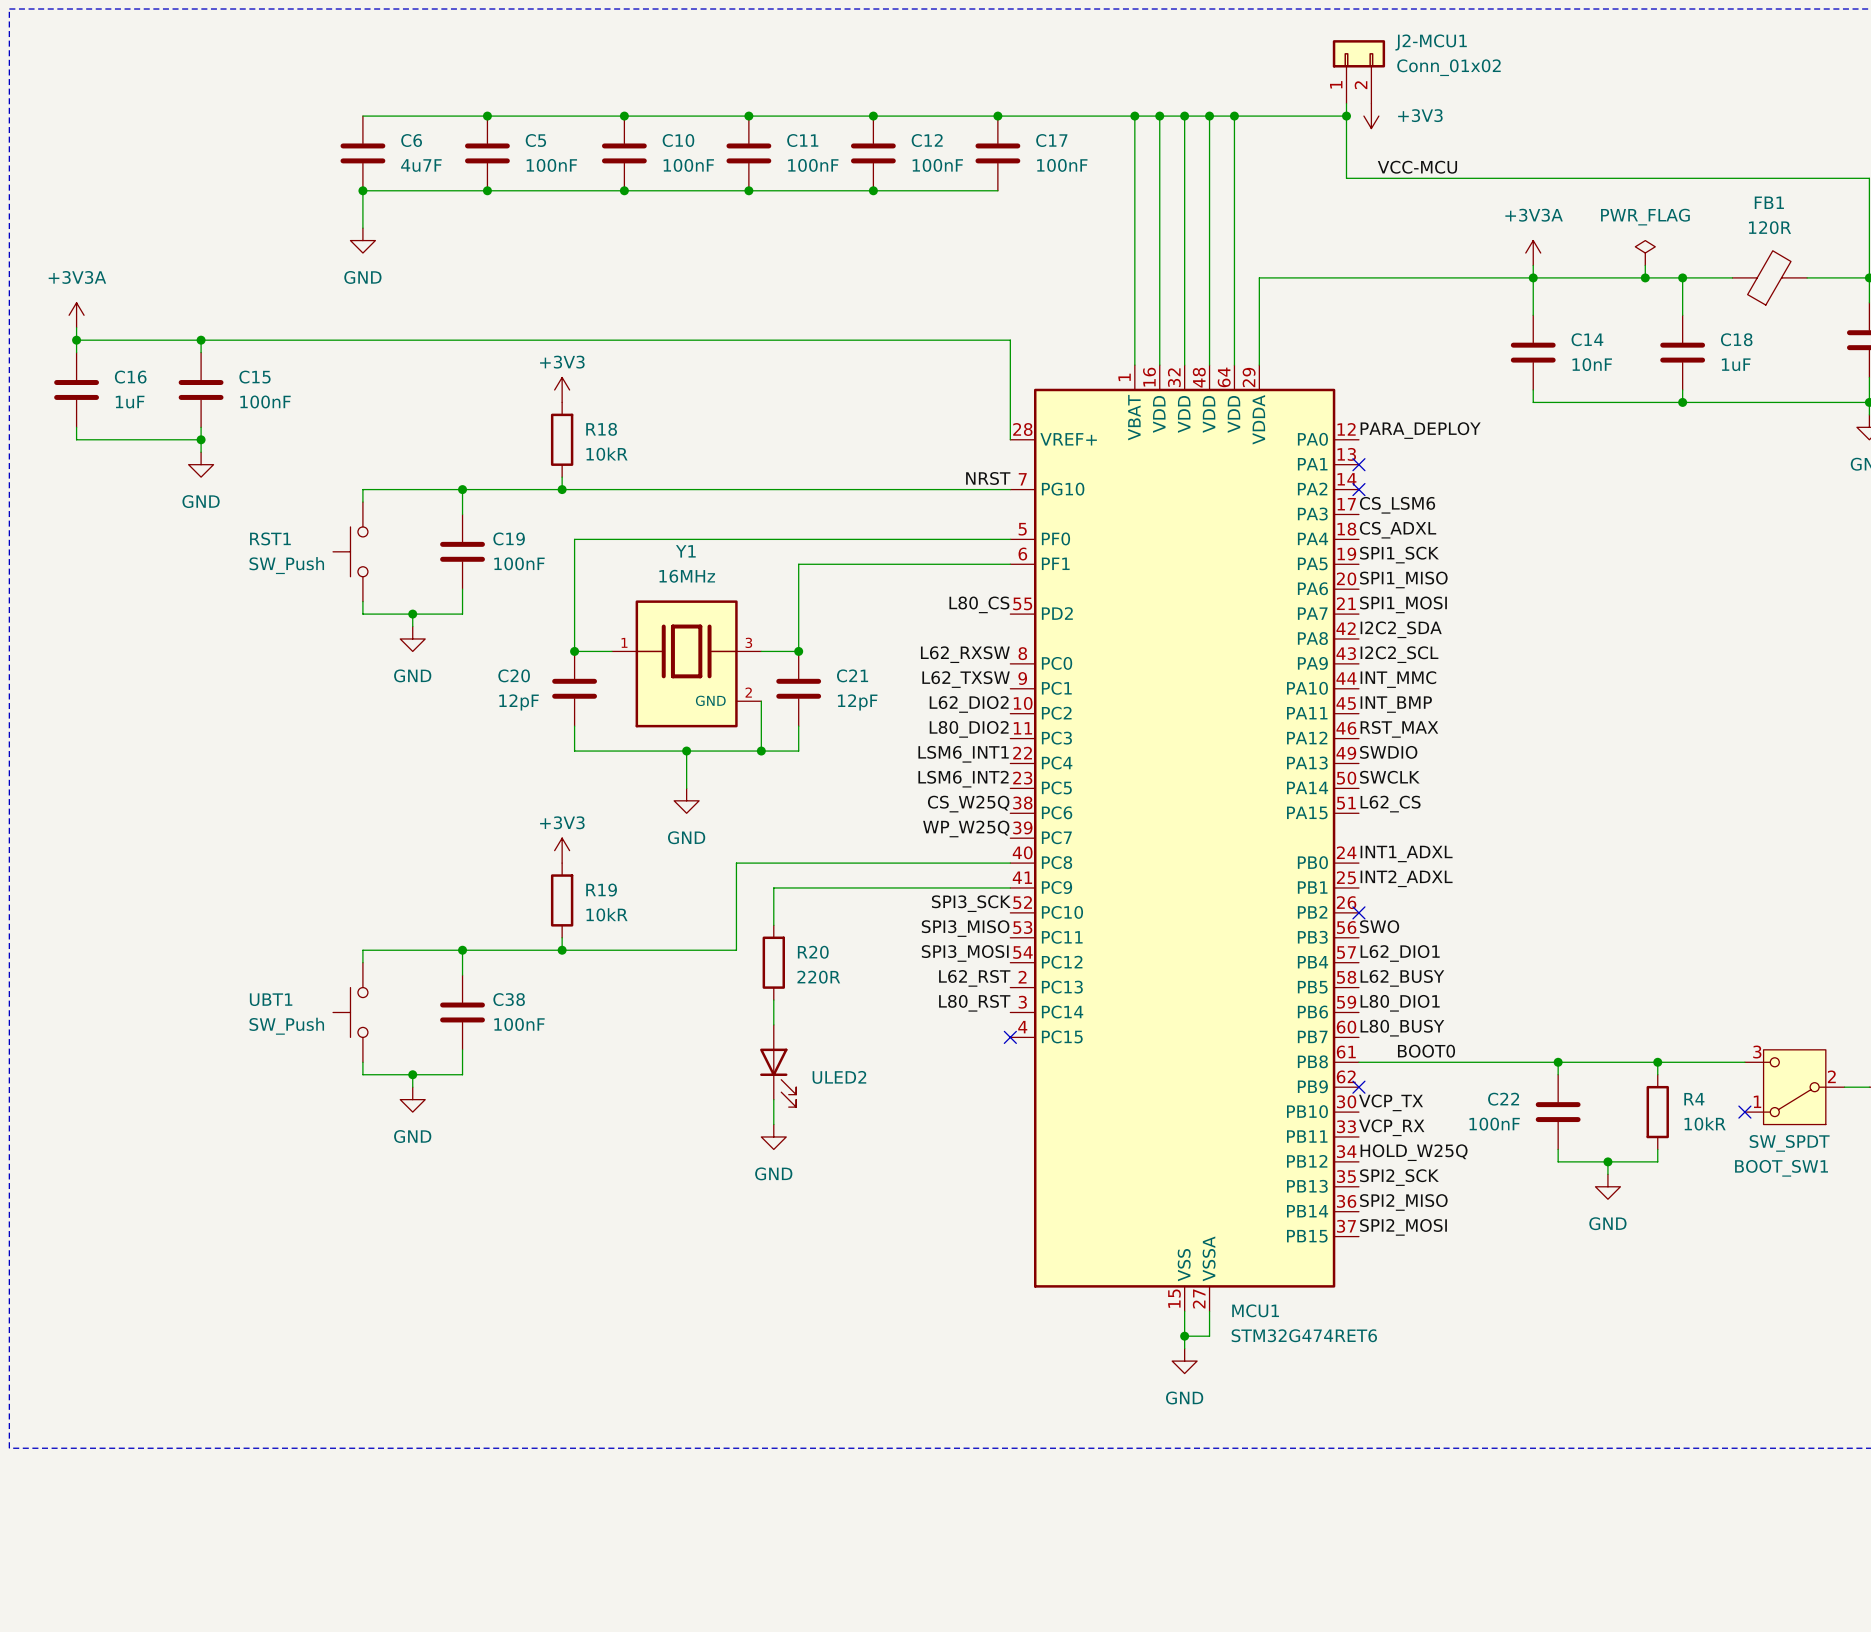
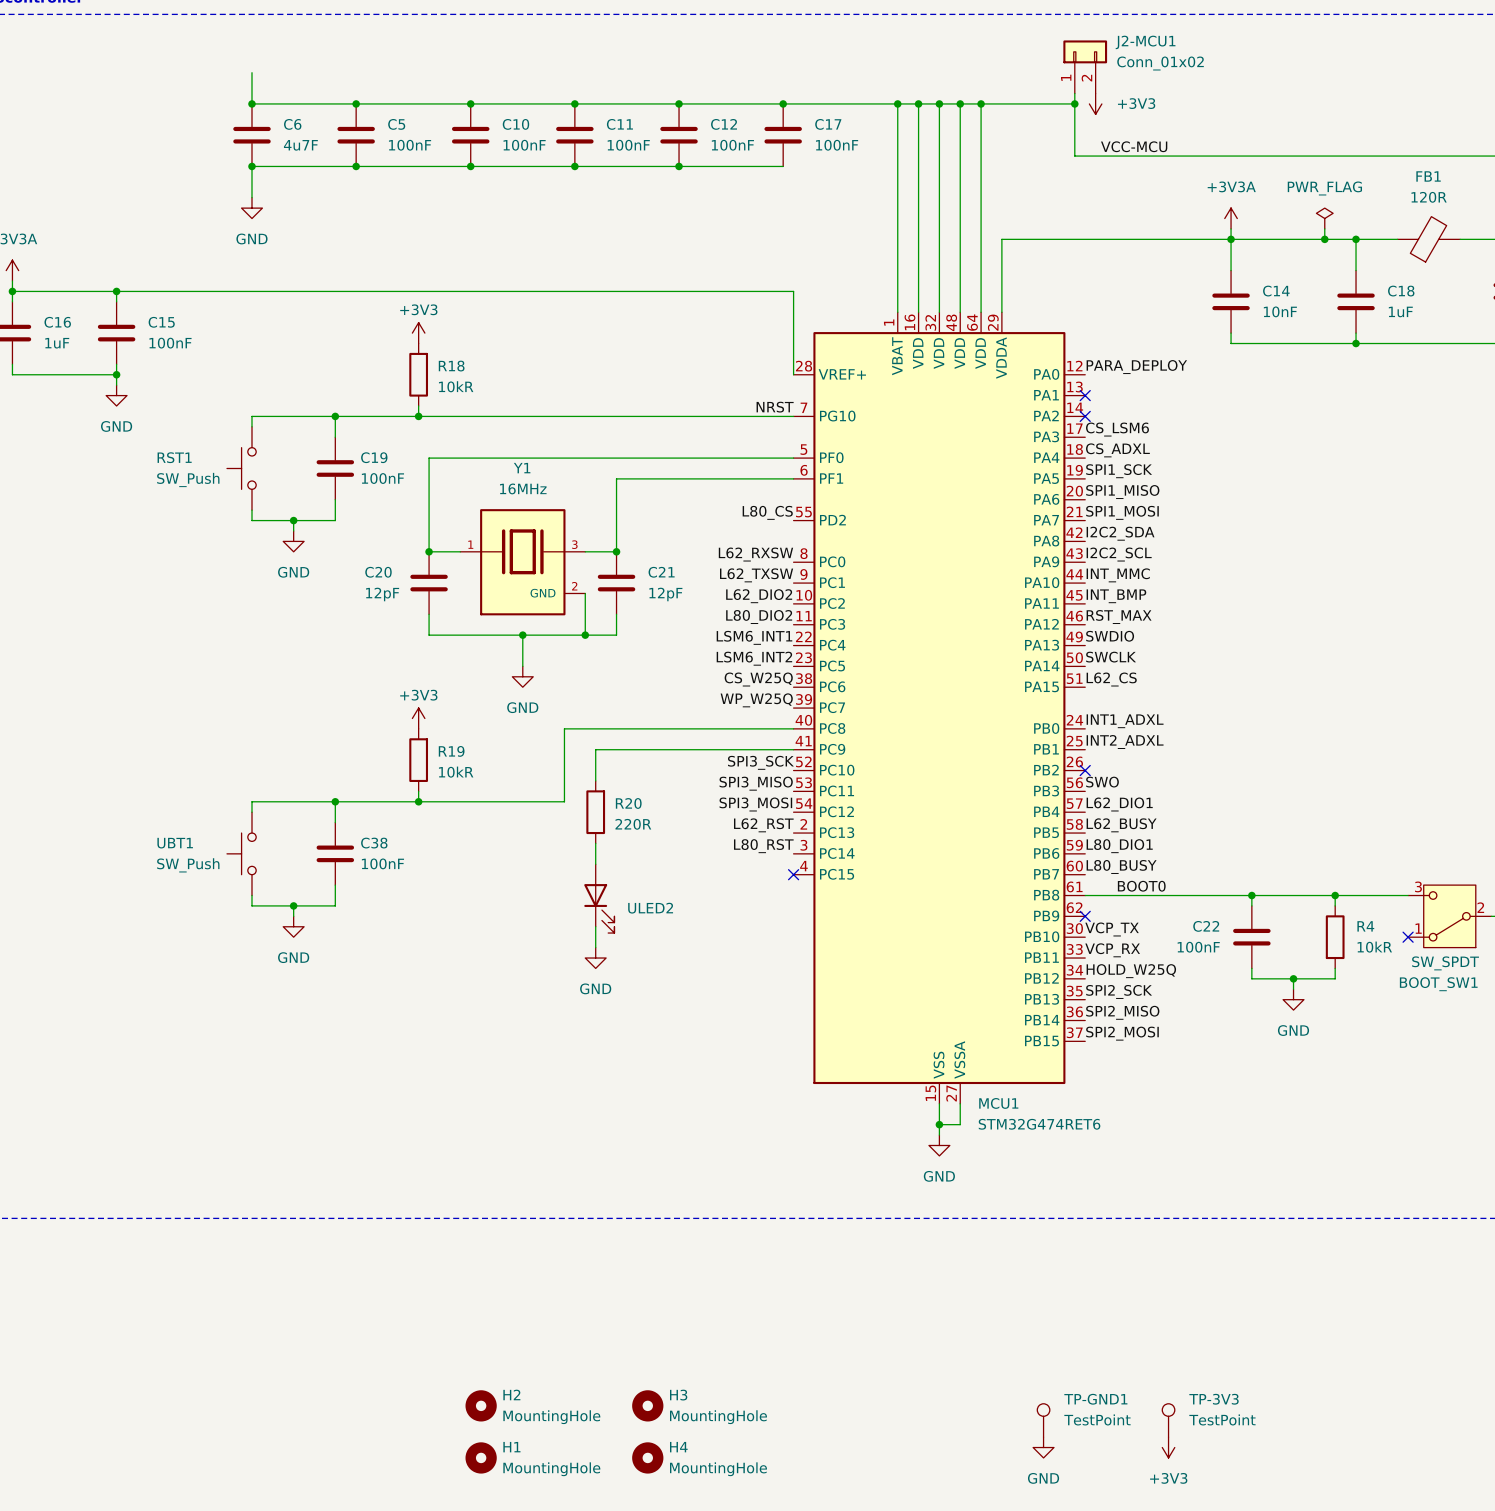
wire: none -> (251, 72) (251, 103)
junction: none -> (251, 103)

